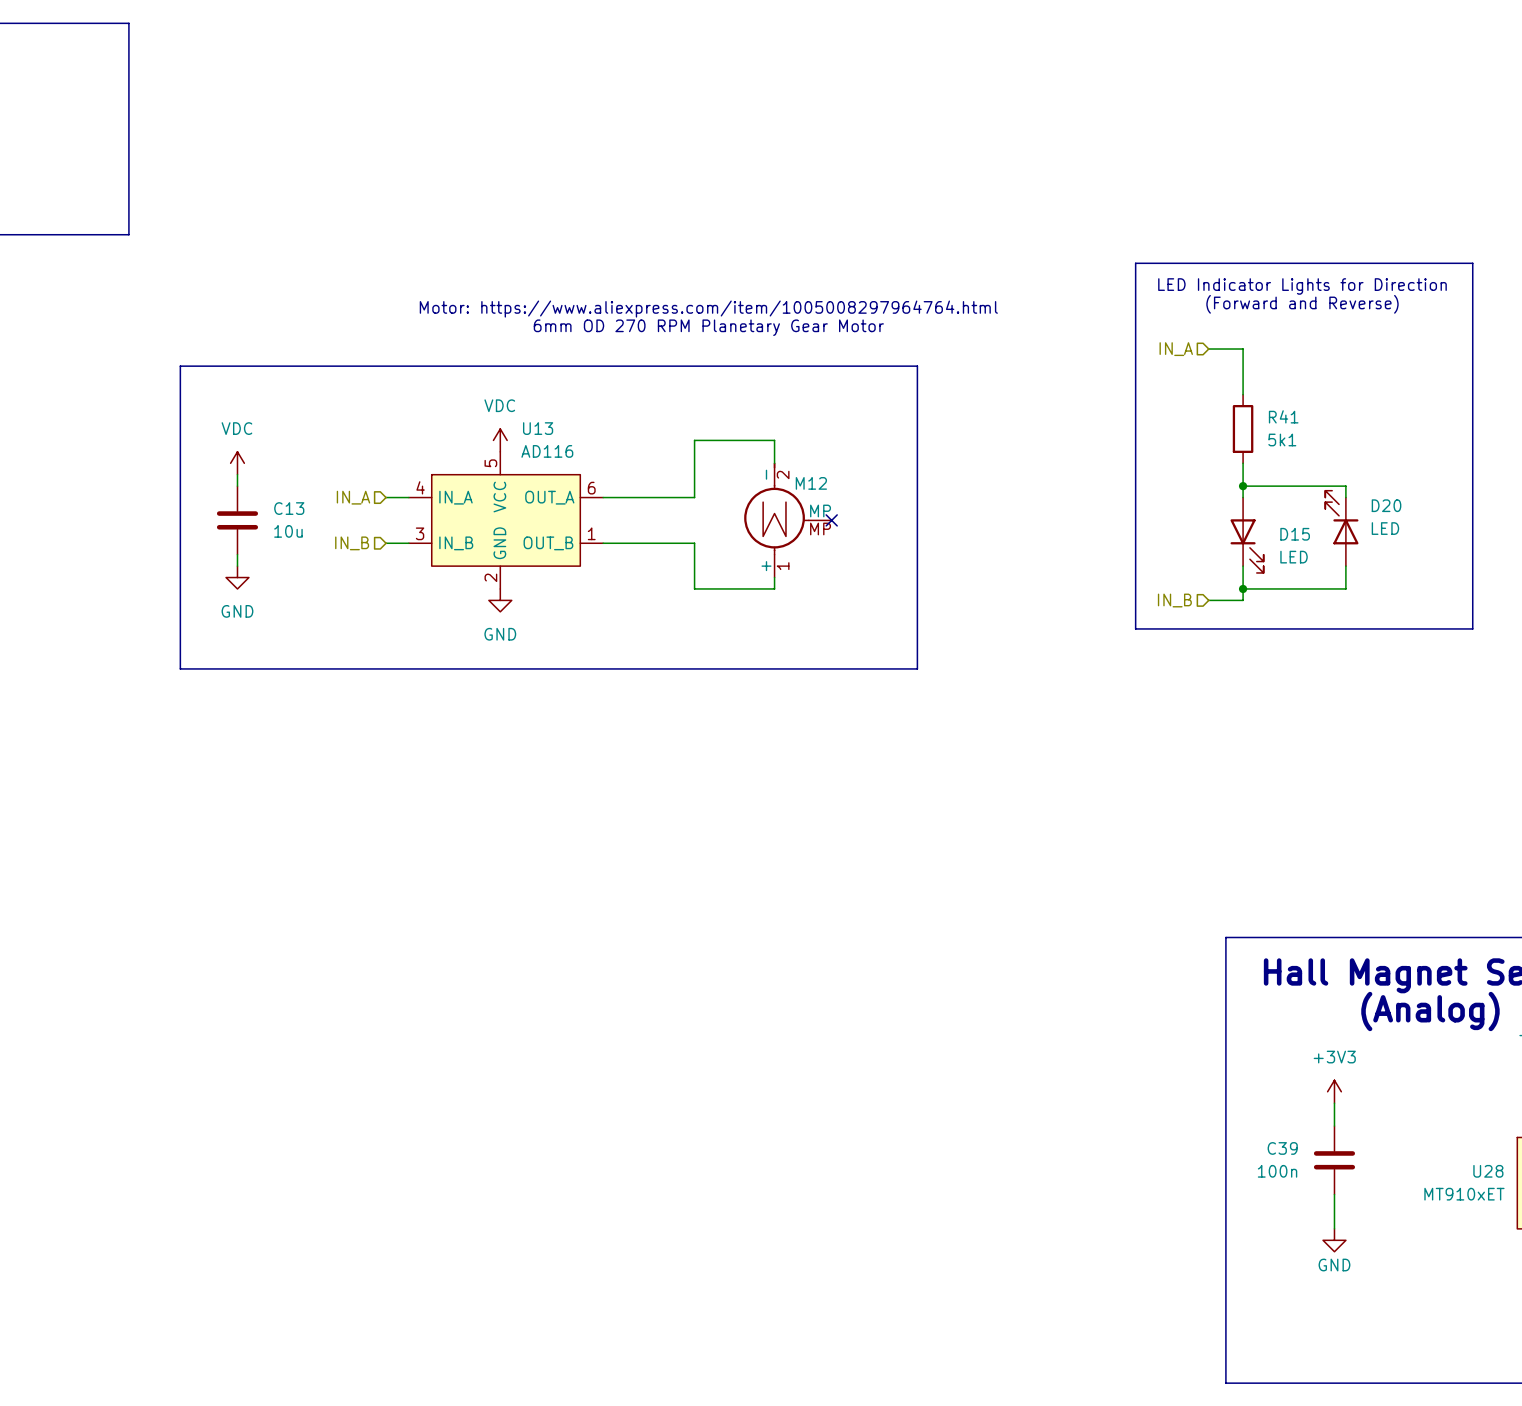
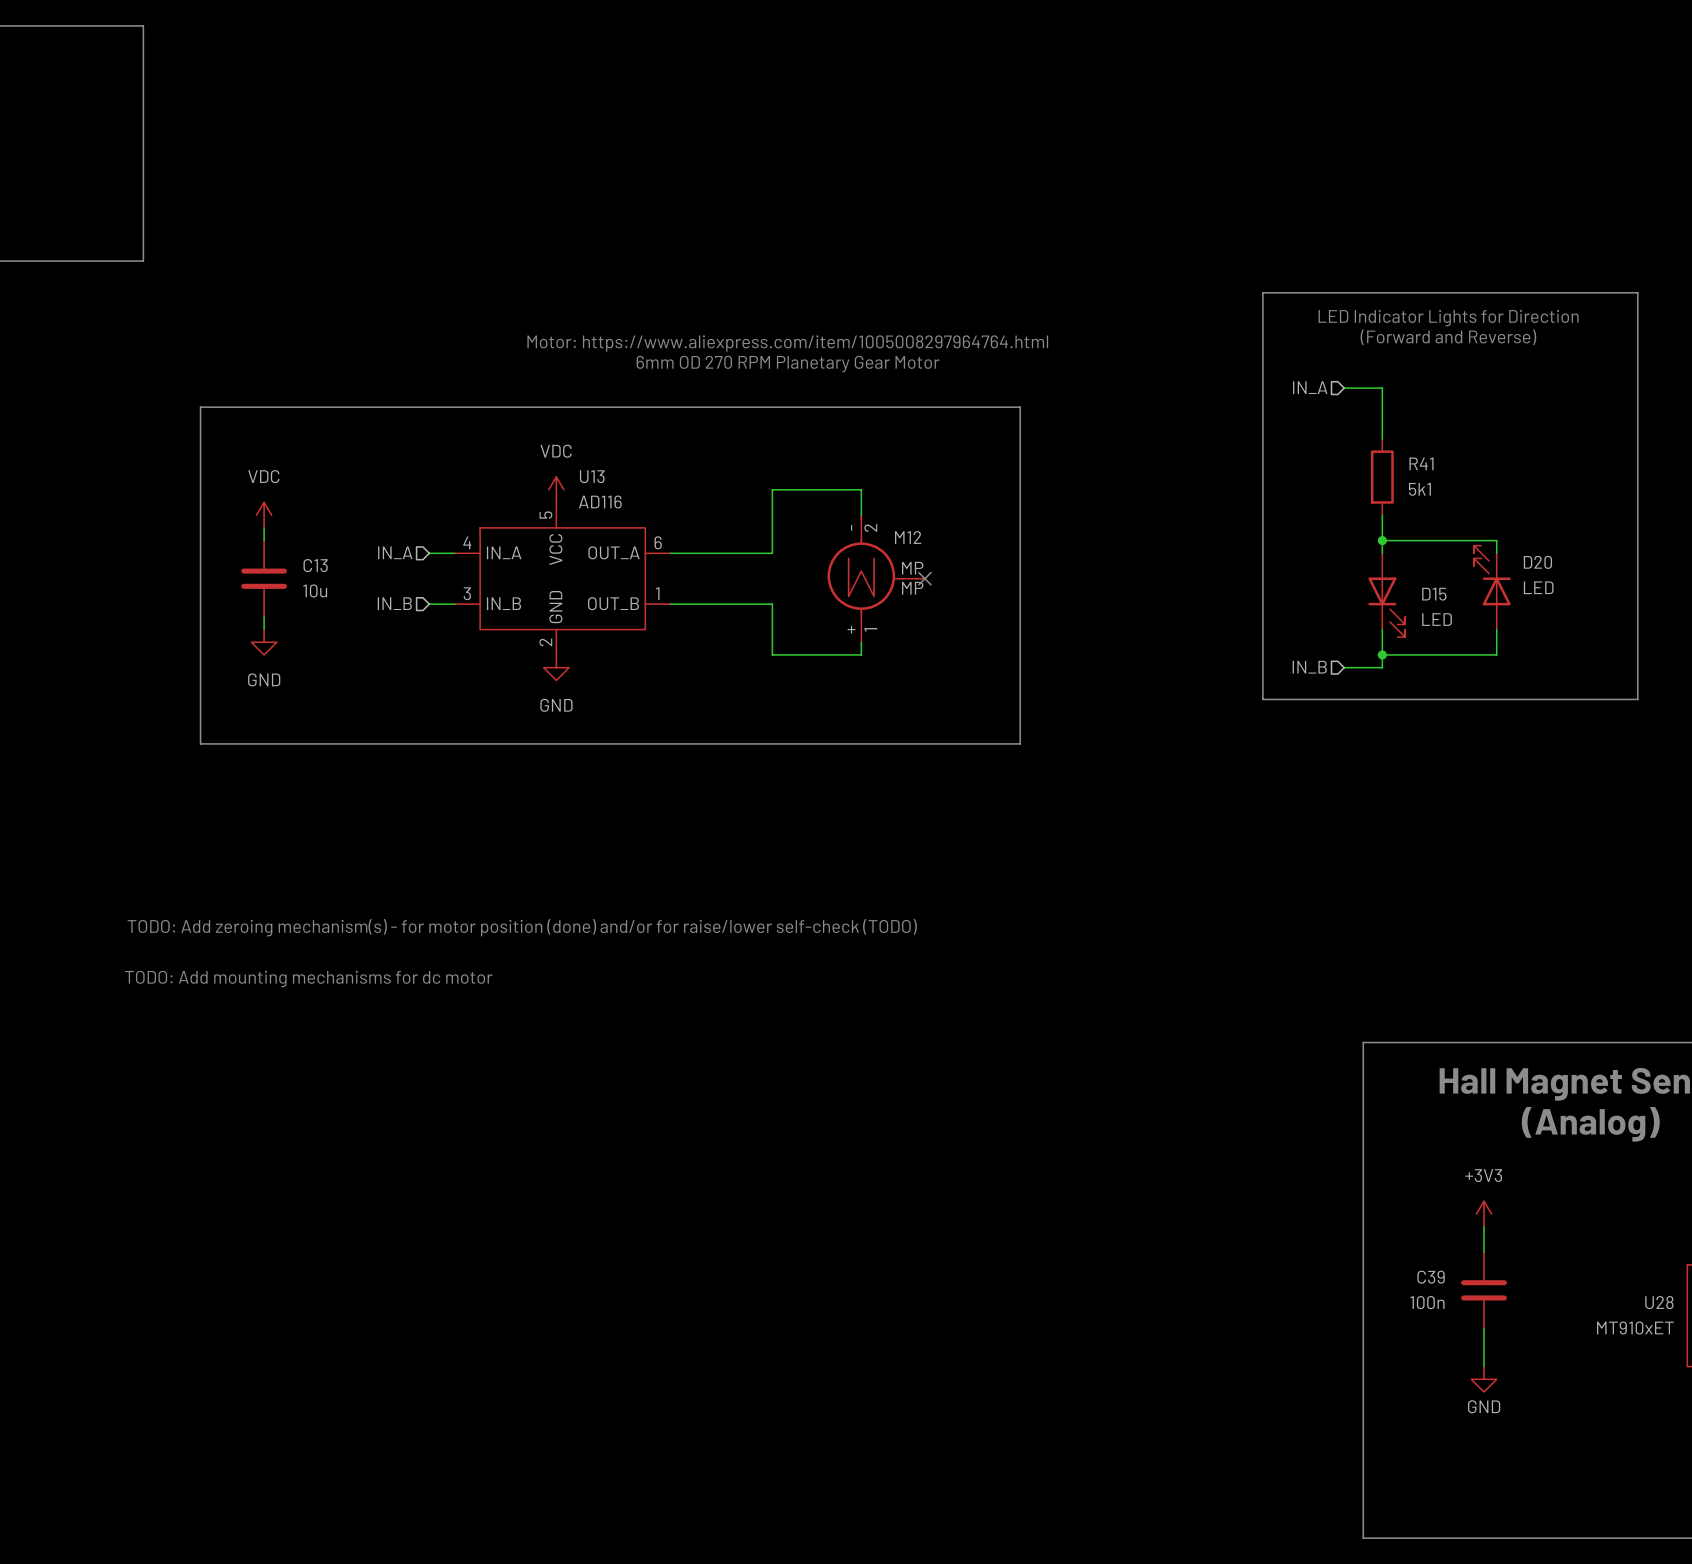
text: none -> TODO: Add zeroing mechanism(s) - for motor position (done) and/or for raise/lower self-check (TODO) (522, 927)
text: none -> TODO: Add mounting mechanisms for dc motor (308, 979)

